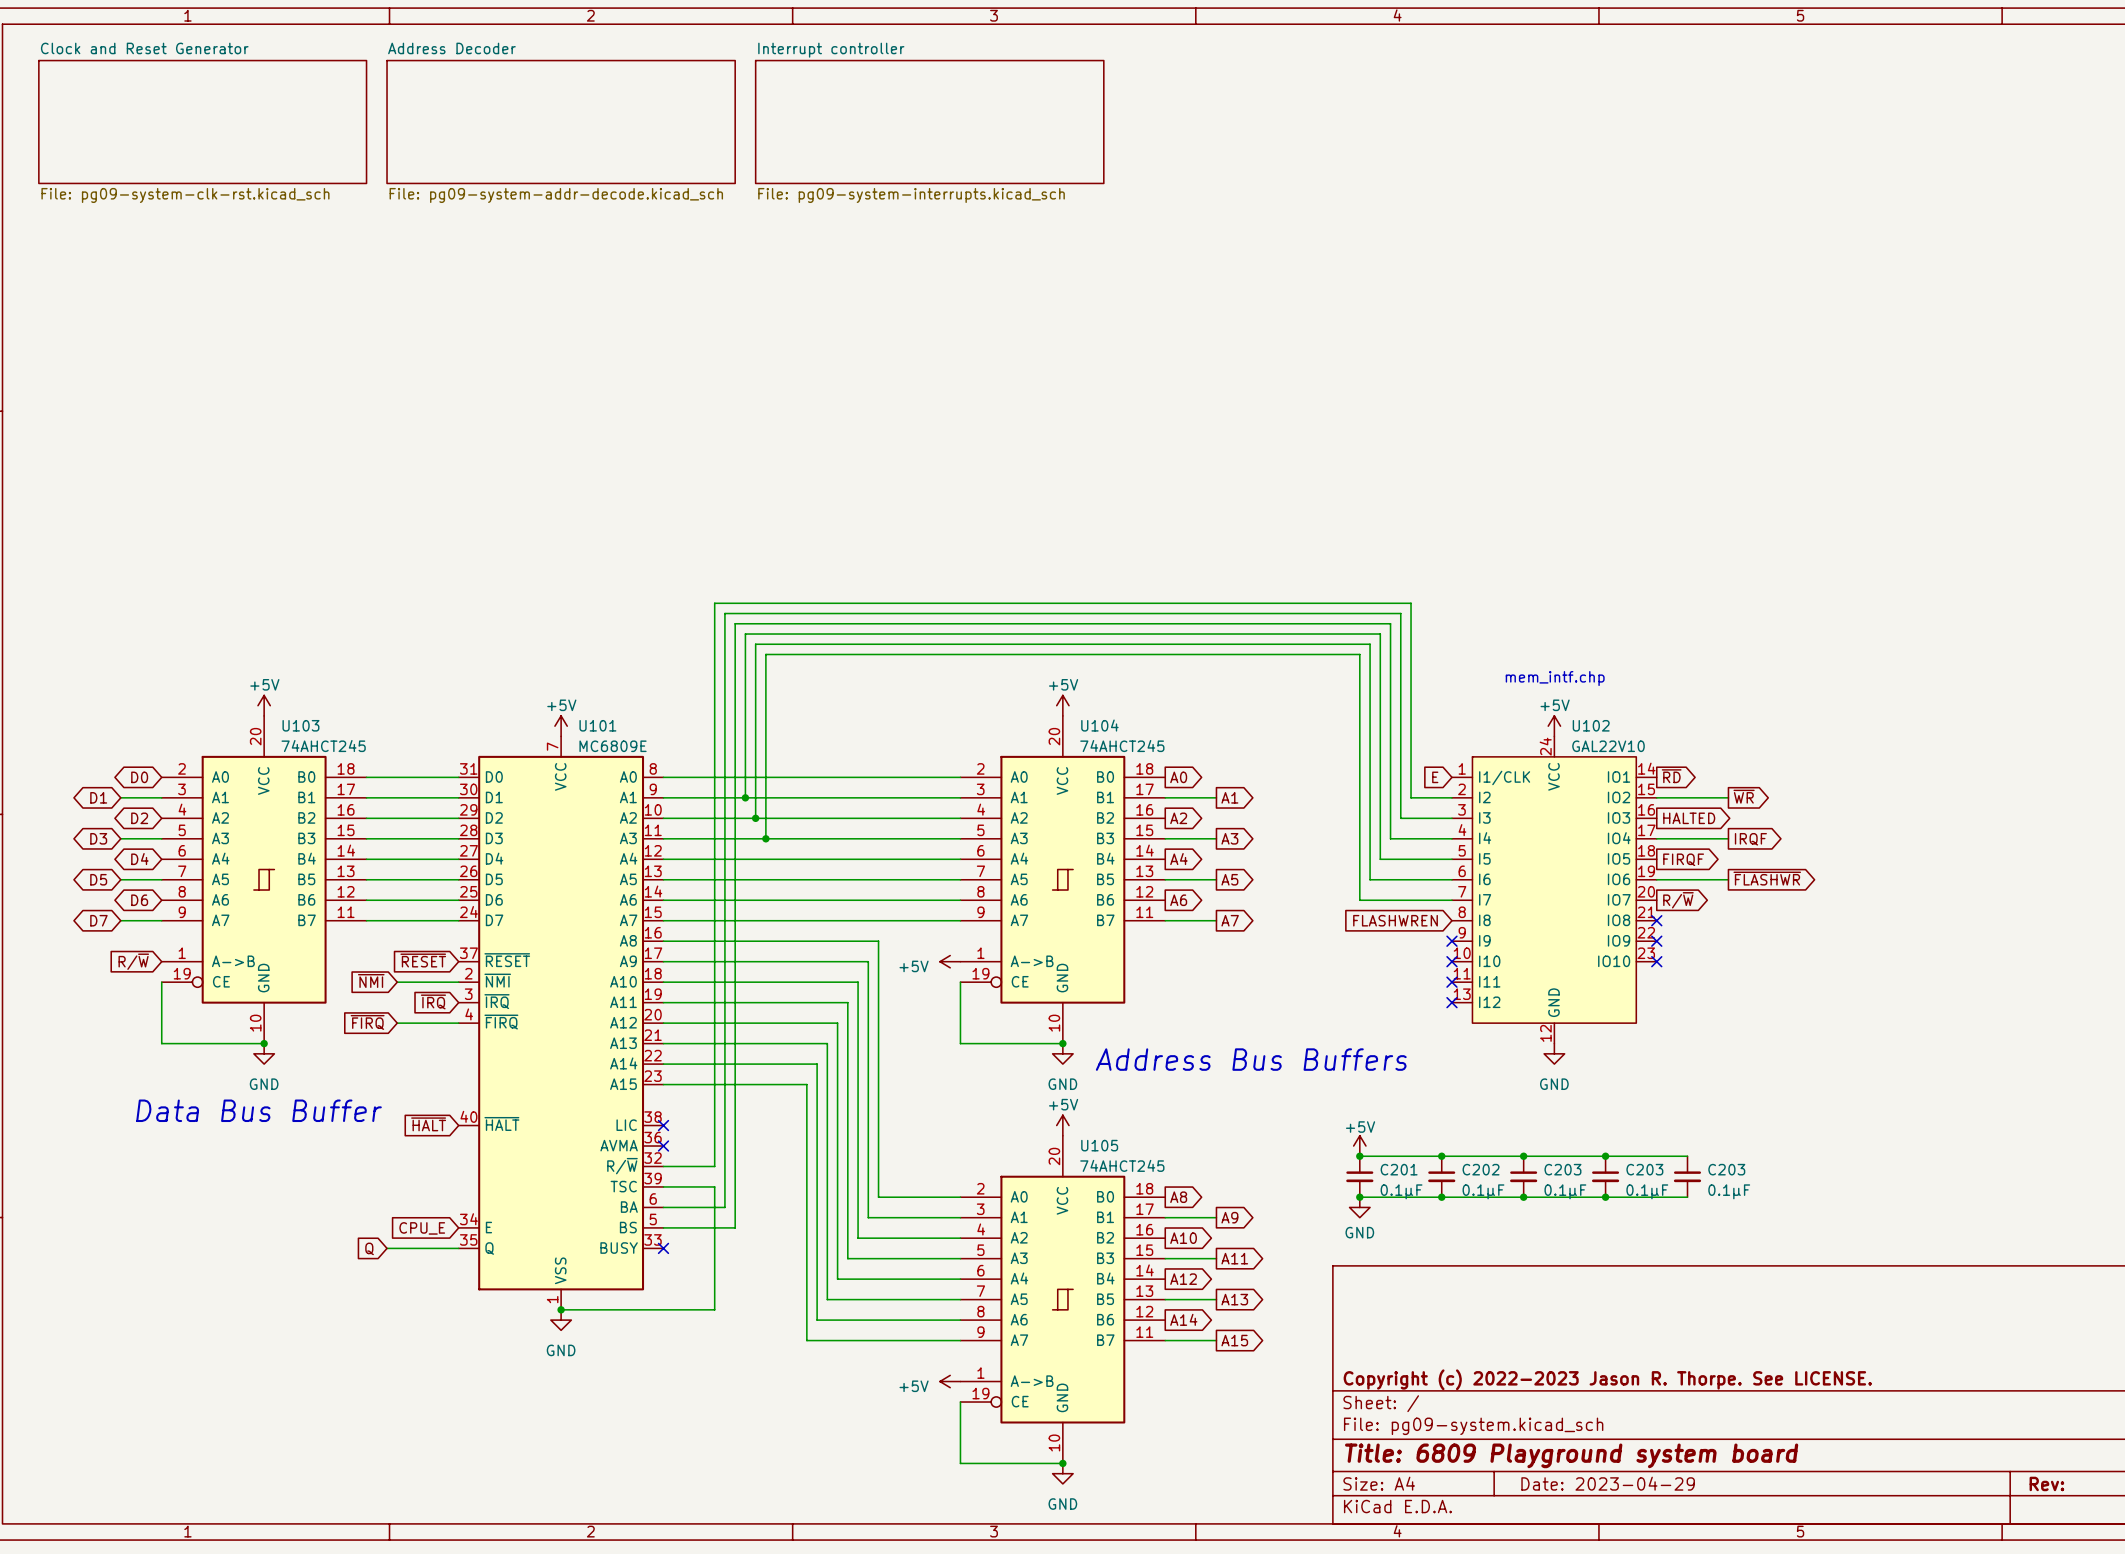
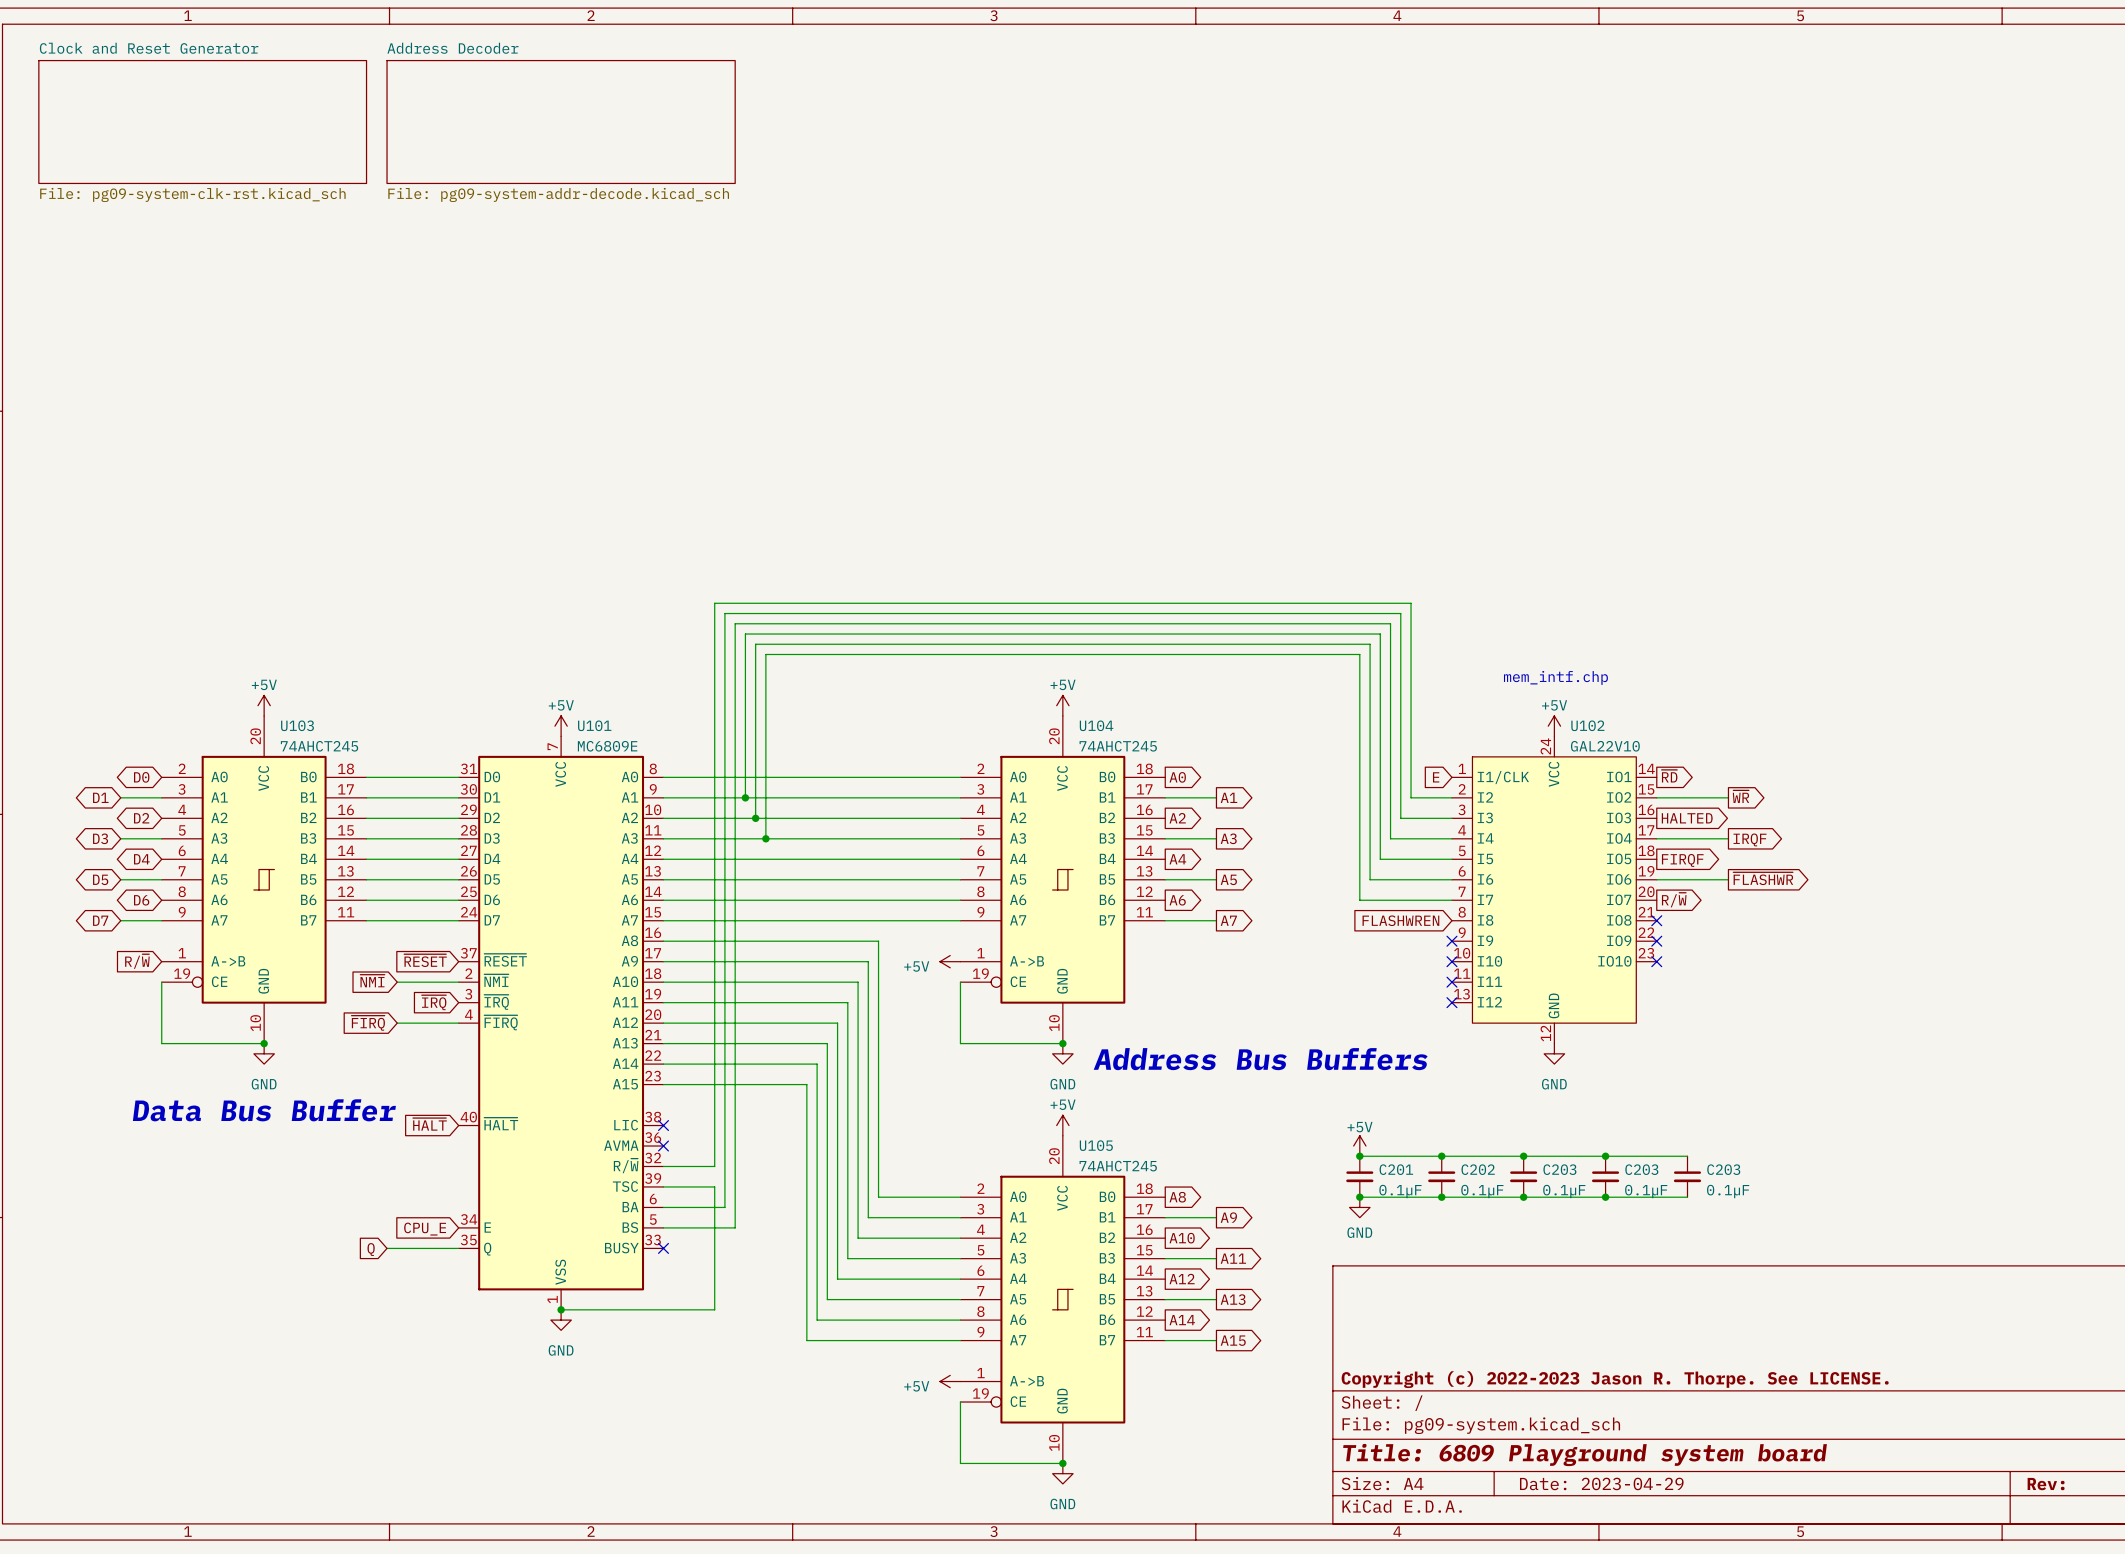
sheet Interrupt controller: File: pg09-system-interrupts.kicad_sch (929, 122) -> none

